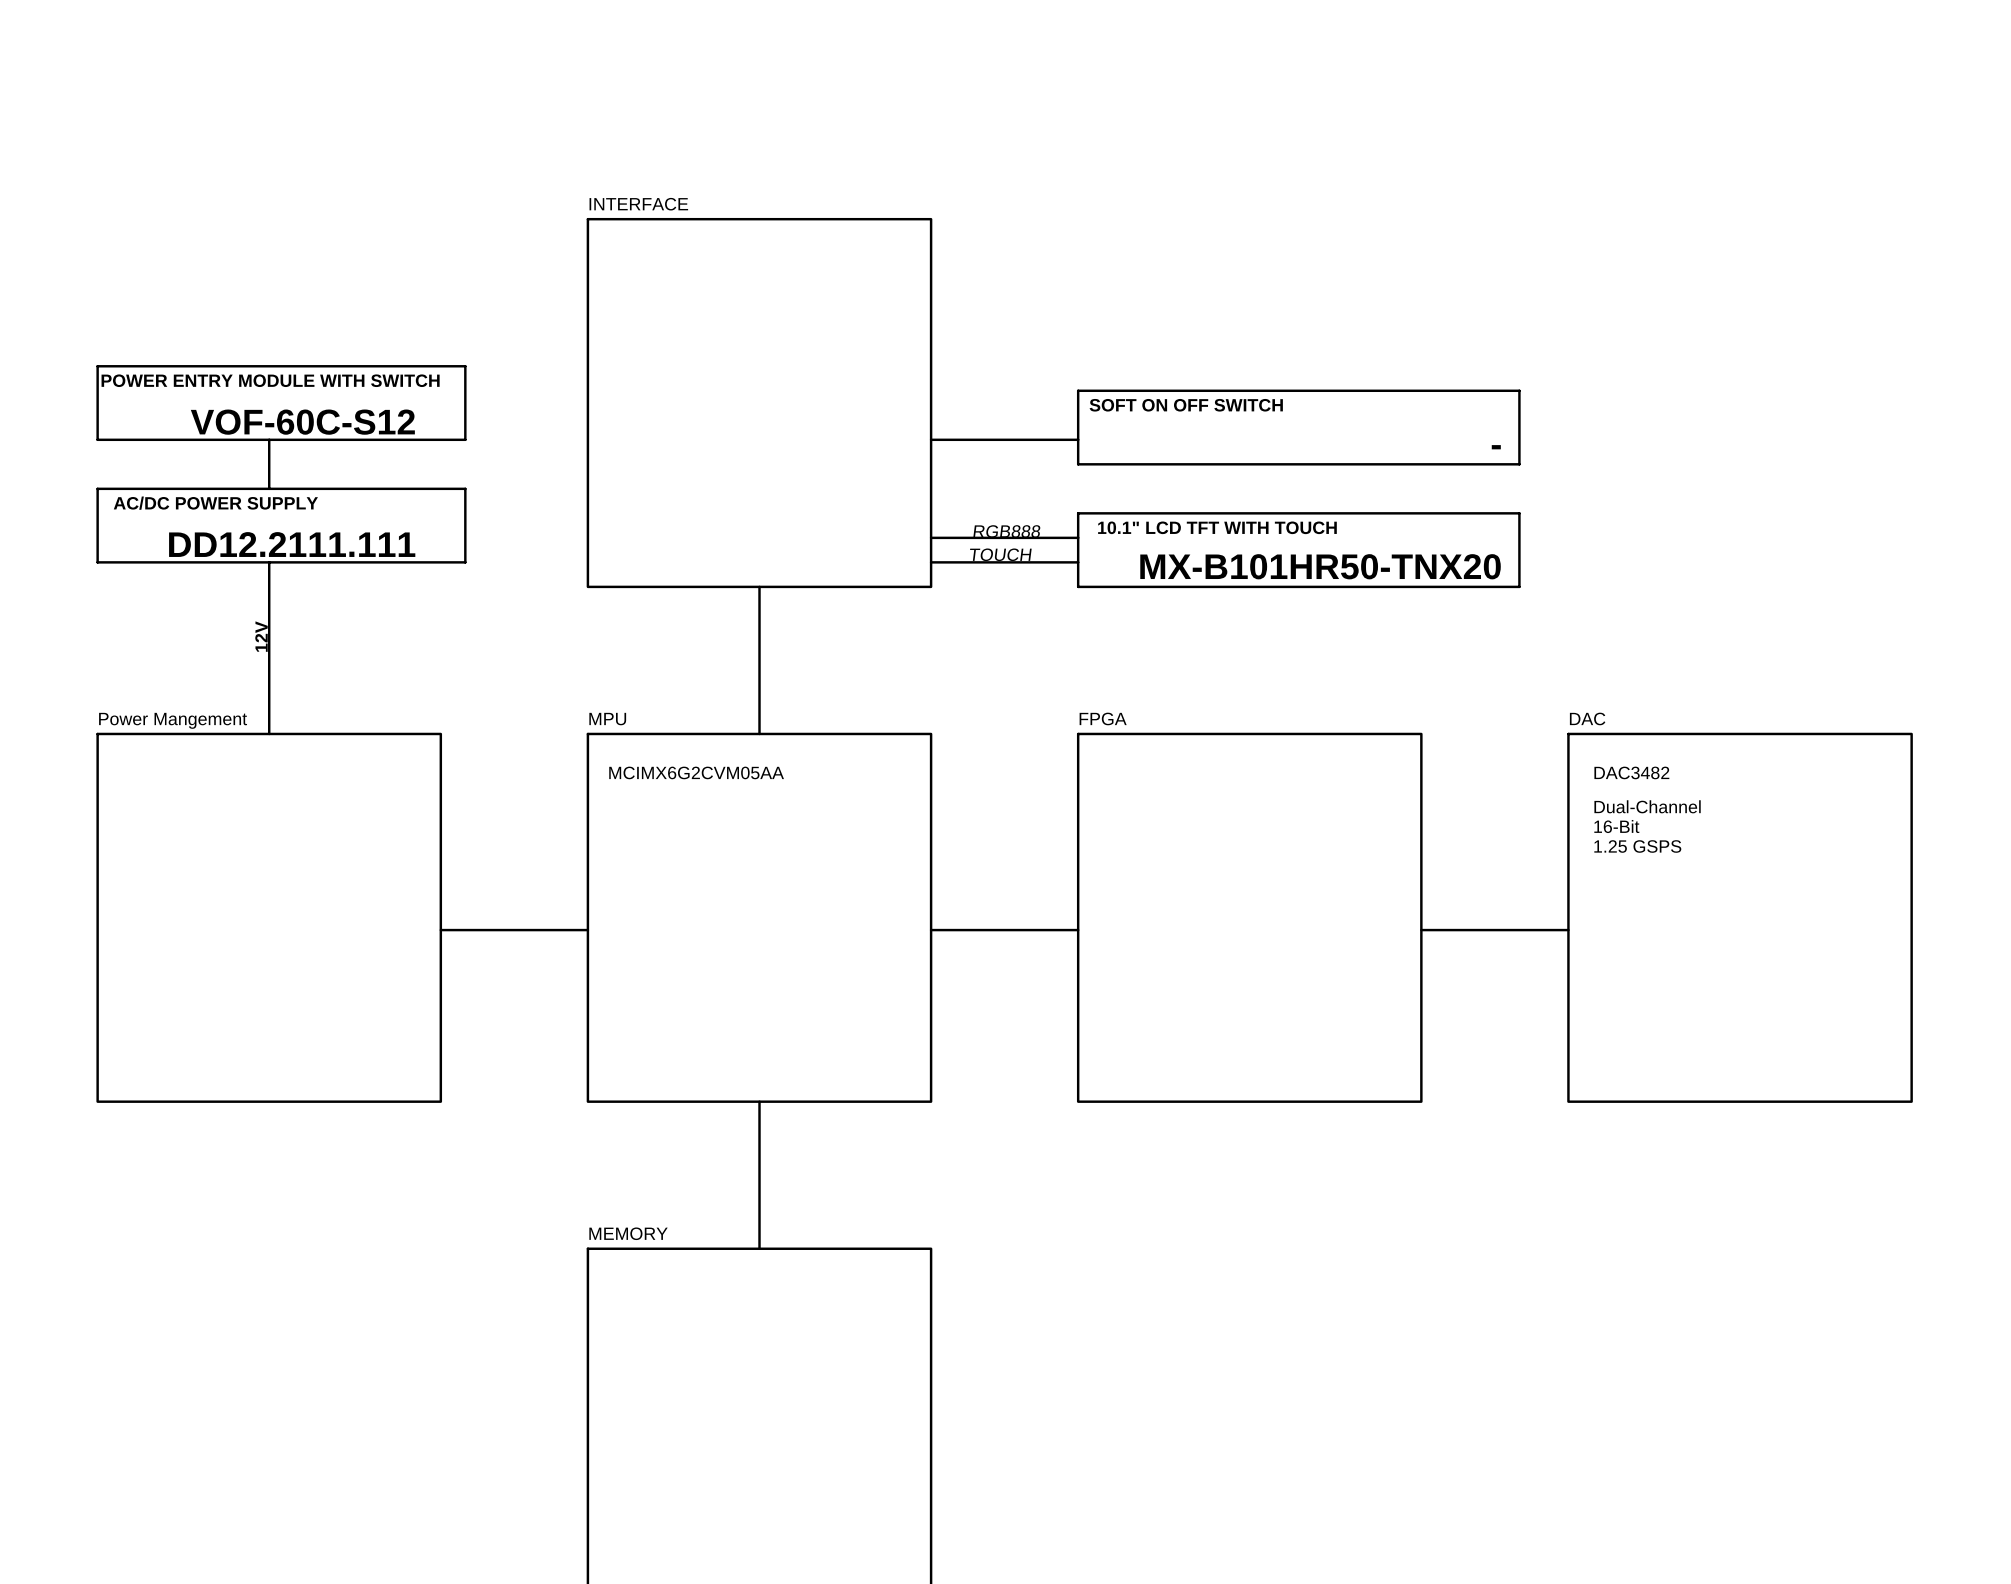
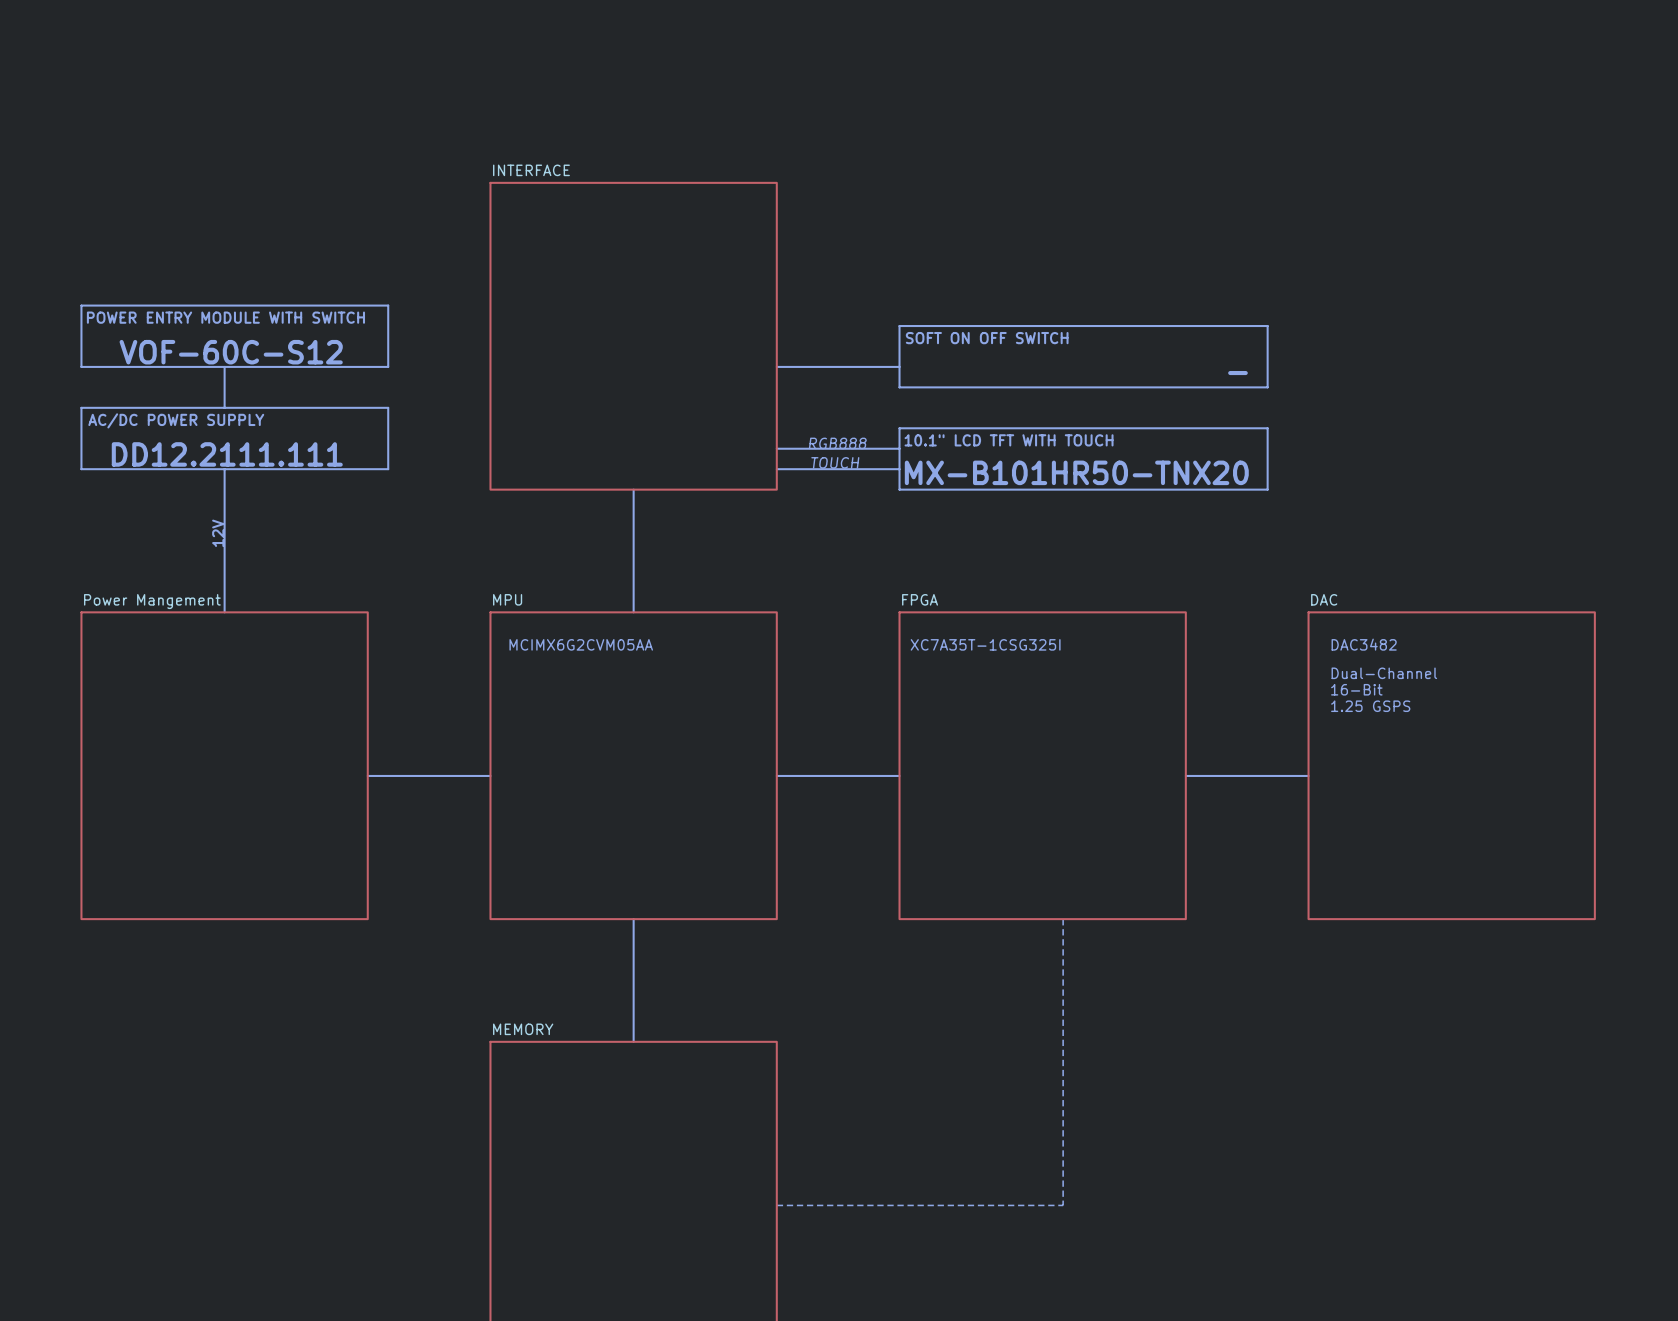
text: none -> XC7A35T-1CSG325I (985, 644)
line: none -> (1063, 919) (1063, 1205) (776, 1205)

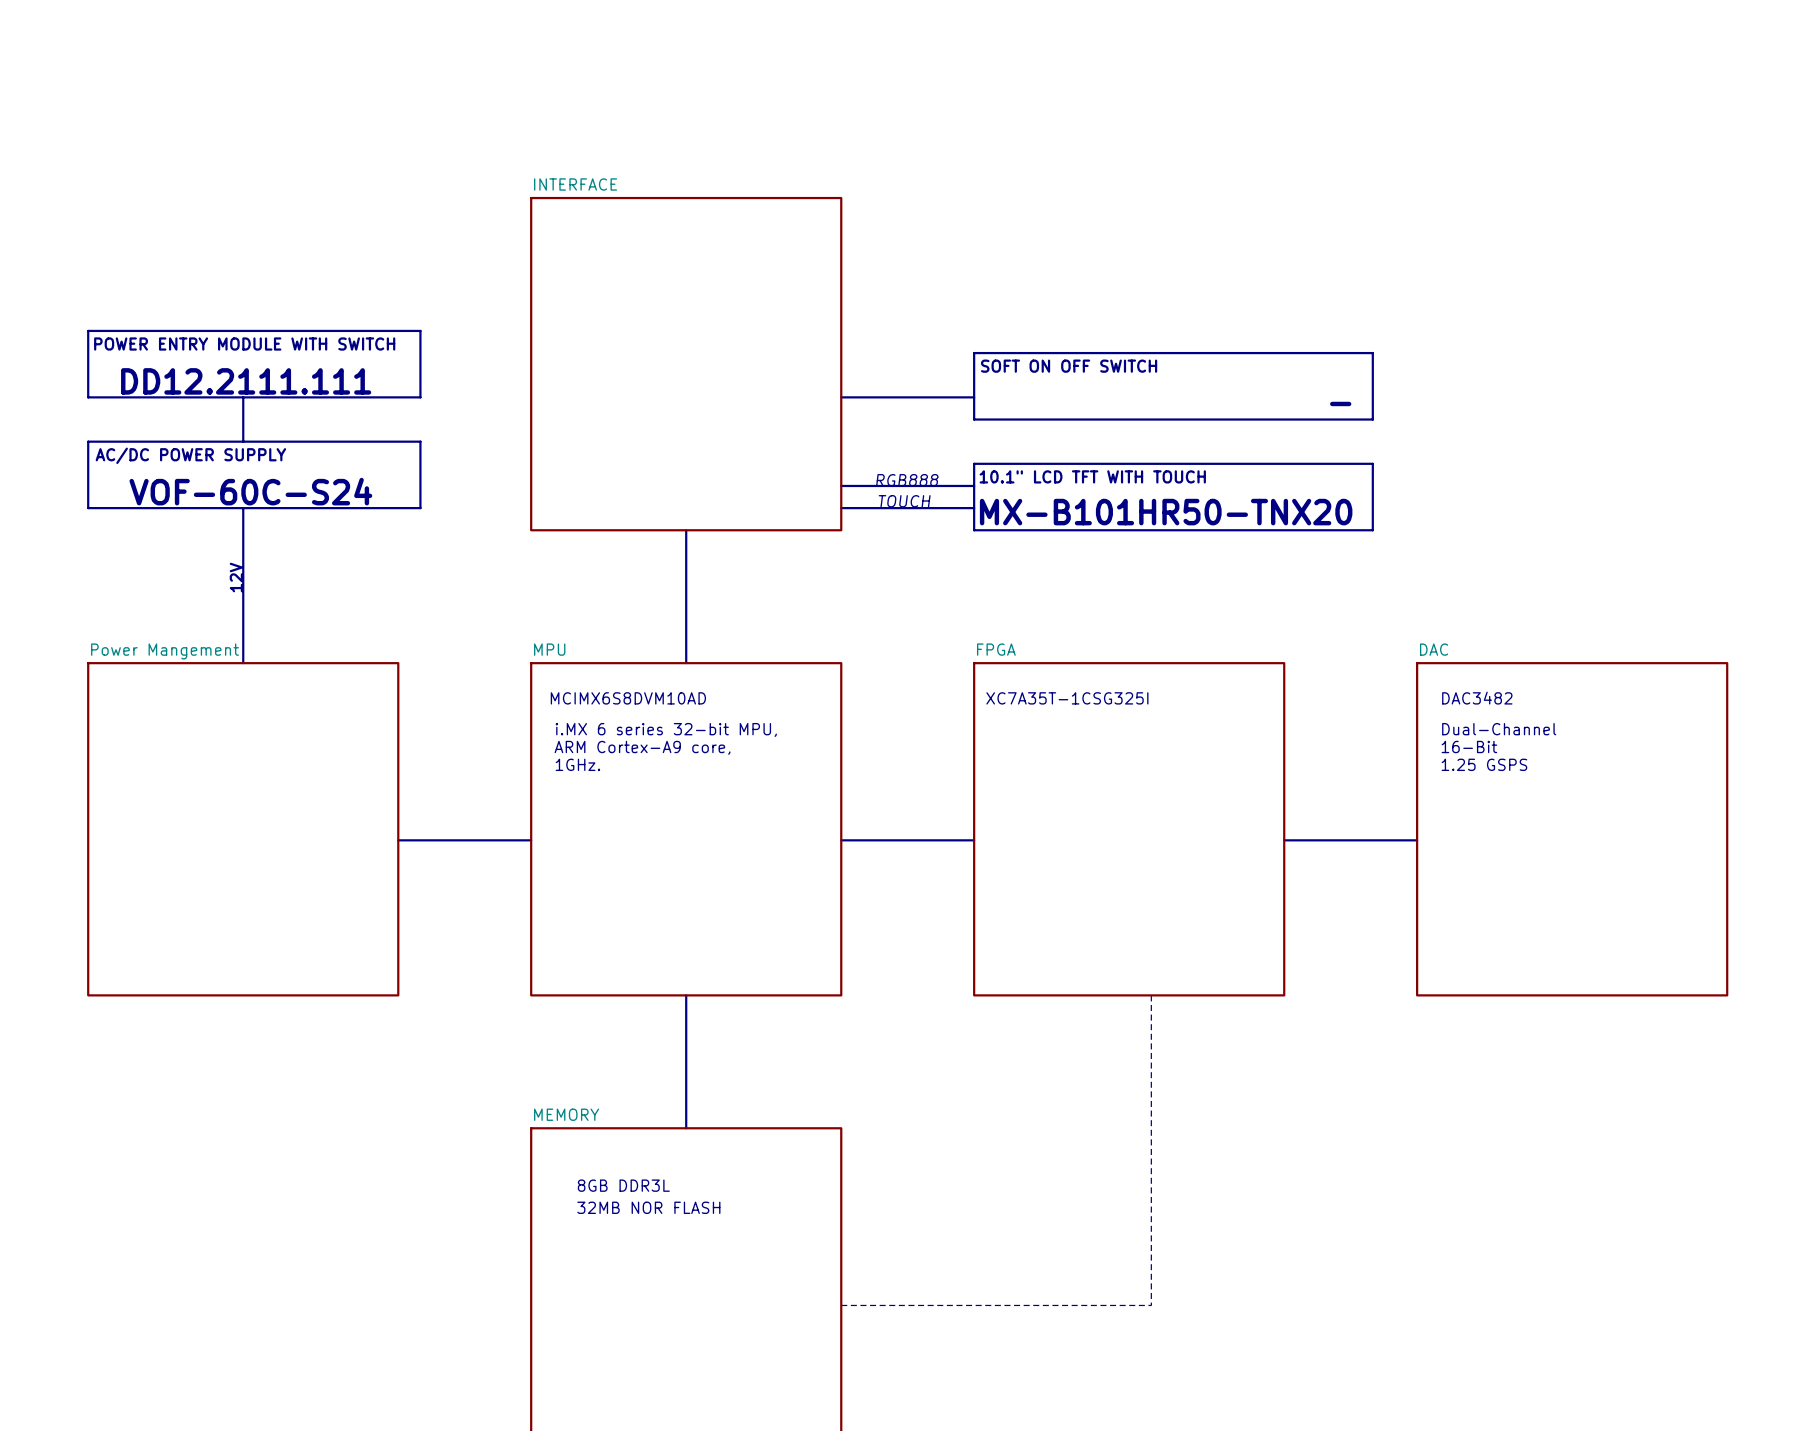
text: VOF-60C-S12 (231, 352) -> DD12.2111.111 (246, 381)
text: DD12.2111.111 (227, 454) -> VOF-60C-S24 (250, 491)
text: MCIMX6G2CVM05AA (581, 644) -> MCIMX6S8DVM10AD (628, 698)
text: none -> i.MX 6 series 32-bit MPU, (666, 729)
text: none -> ARM Cortex-A9 core, (642, 747)
text: none -> 1GHz. (577, 764)
text: none -> 8GB DDR3L (623, 1185)
text: none -> 32MB NOR FLASH (648, 1207)

